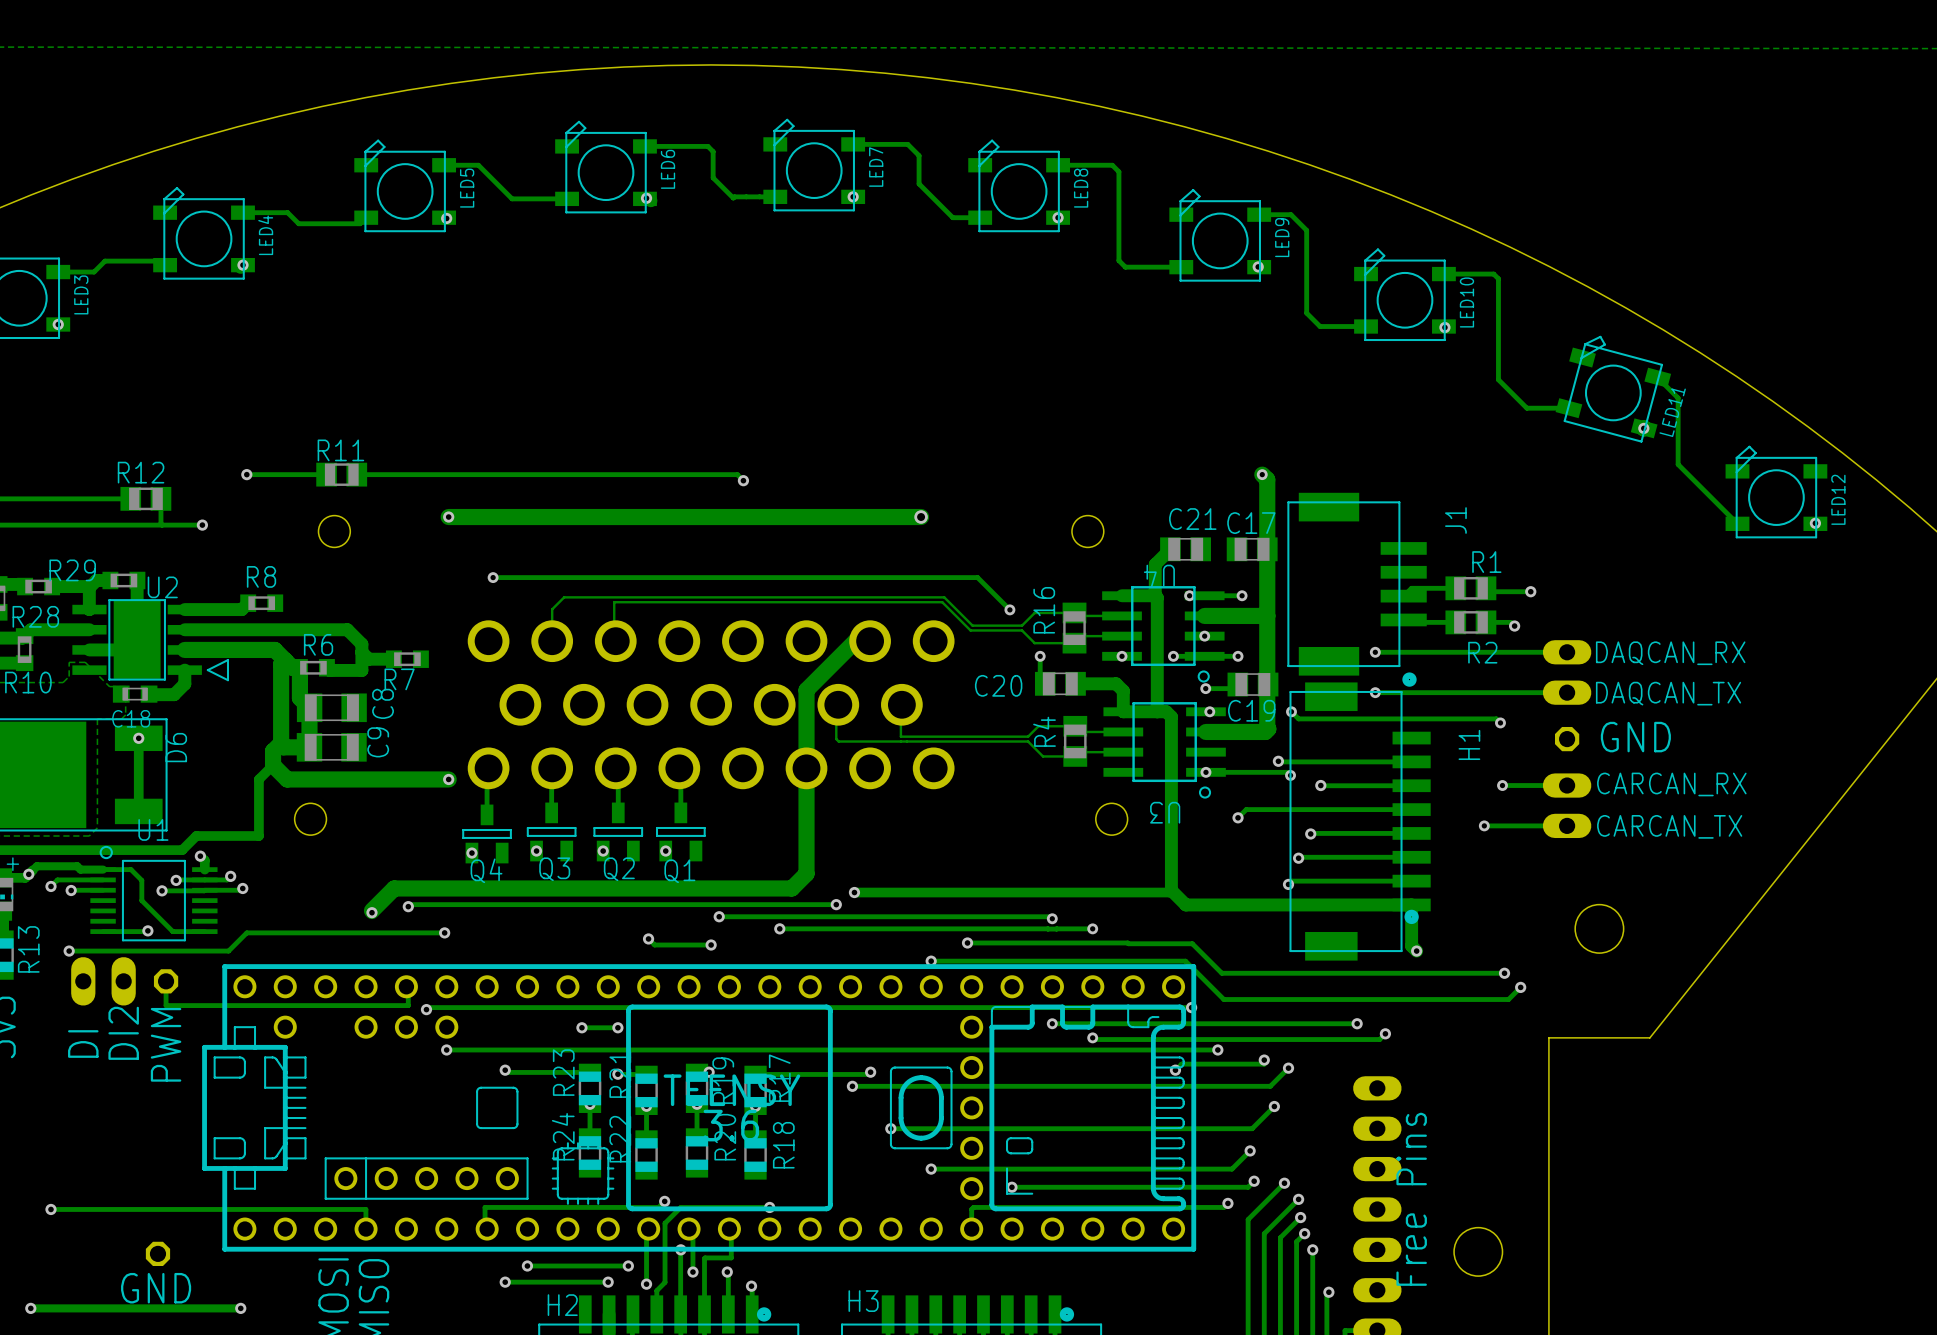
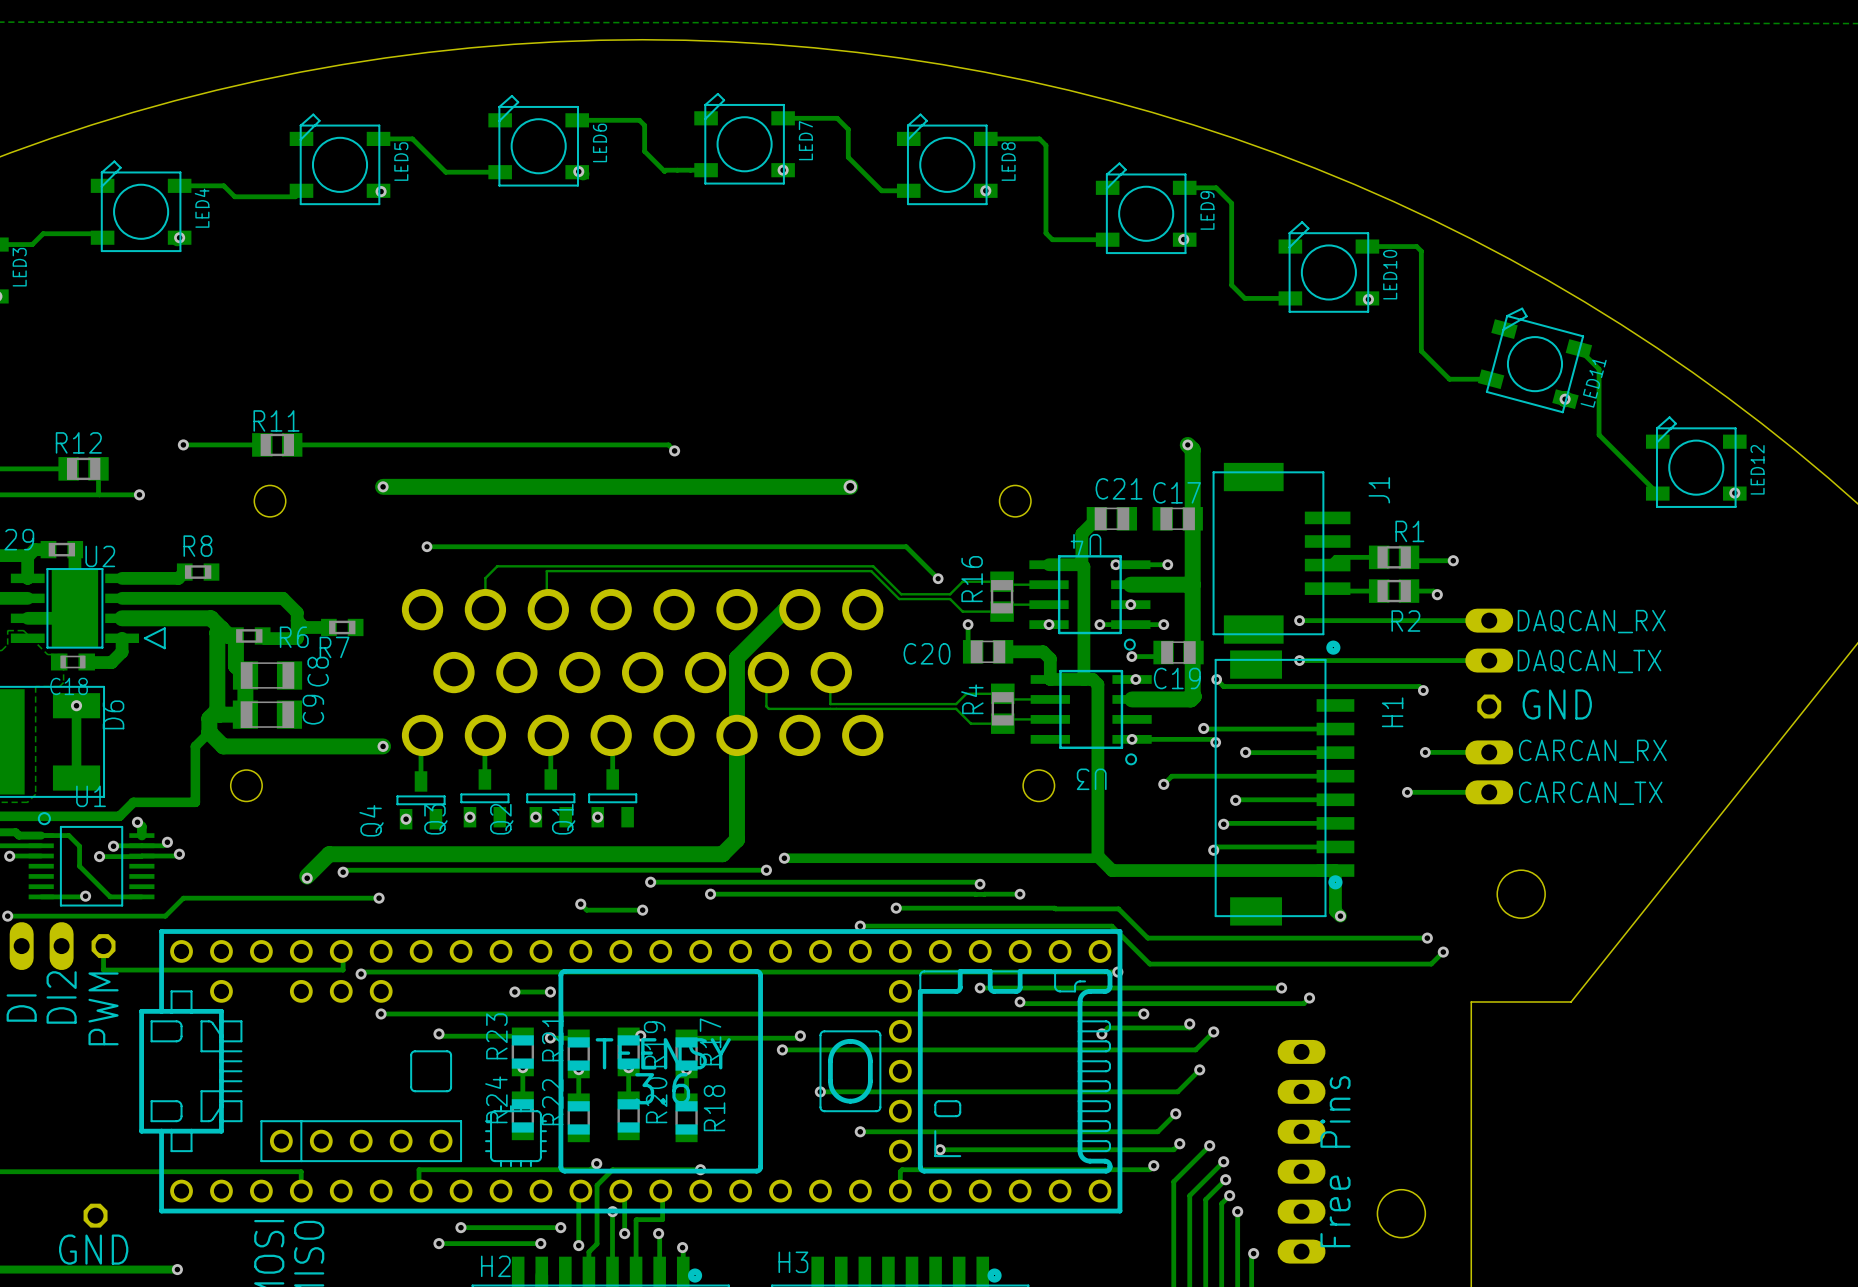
R6 name position: R6 (318, 644) -> R6 (294, 637)
Q3 name rotation: 0° (554, 869) -> 90° counterclockwise (435, 819)
Q3 name position: Q3 (554, 869) -> Q3 (435, 819)
Q2 name rotation: 0° (619, 869) -> 90° counterclockwise (501, 819)
Q2 name position: Q2 (619, 869) -> Q2 (501, 819)
Q4 name rotation: 0° (486, 870) -> 90° counterclockwise (371, 820)
Q4 name position: Q4 (486, 870) -> Q4 (371, 820)
Q1 name rotation: 0° (679, 871) -> 90° counterclockwise (563, 819)
Q1 name position: Q1 (679, 871) -> Q1 (563, 819)

